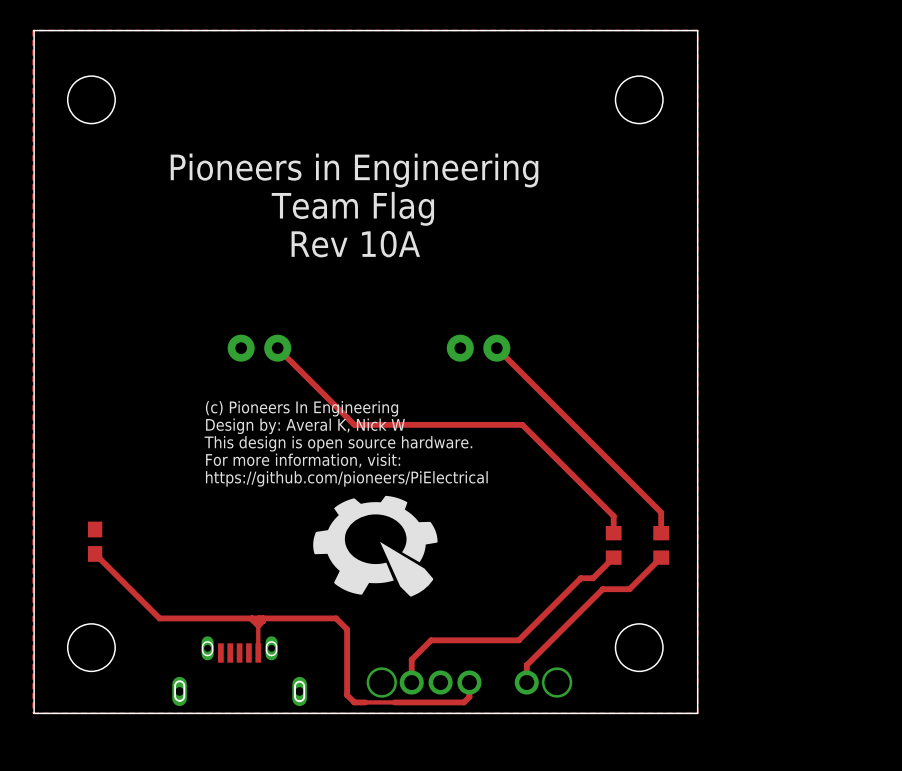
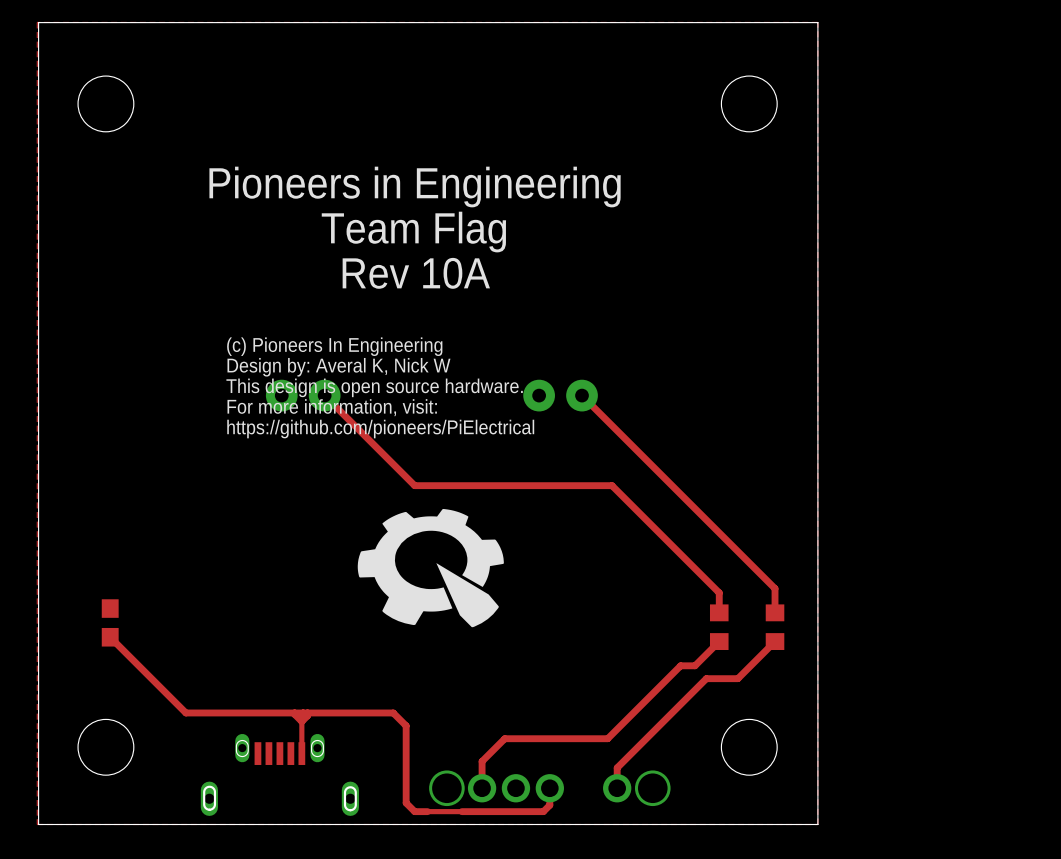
text position: (c) Pioneers In Engineering (302, 408) -> (c) Pioneers In Engineering (334, 346)
text position: Design by: Averal K, Nick W (305, 426) -> Design by: Averal K, Nick W (338, 367)
text position: This design is open source hardware. (338, 443) -> This design is open source hardware. (374, 387)
text position: For more information, visit: (303, 460) -> For more information, visit: (332, 407)
text position: https://github.com/pioneers/PiElectrical (346, 478) -> https://github.com/pioneers/PiElectrical (380, 429)
drawing position: (375, 546) -> (430, 568)

